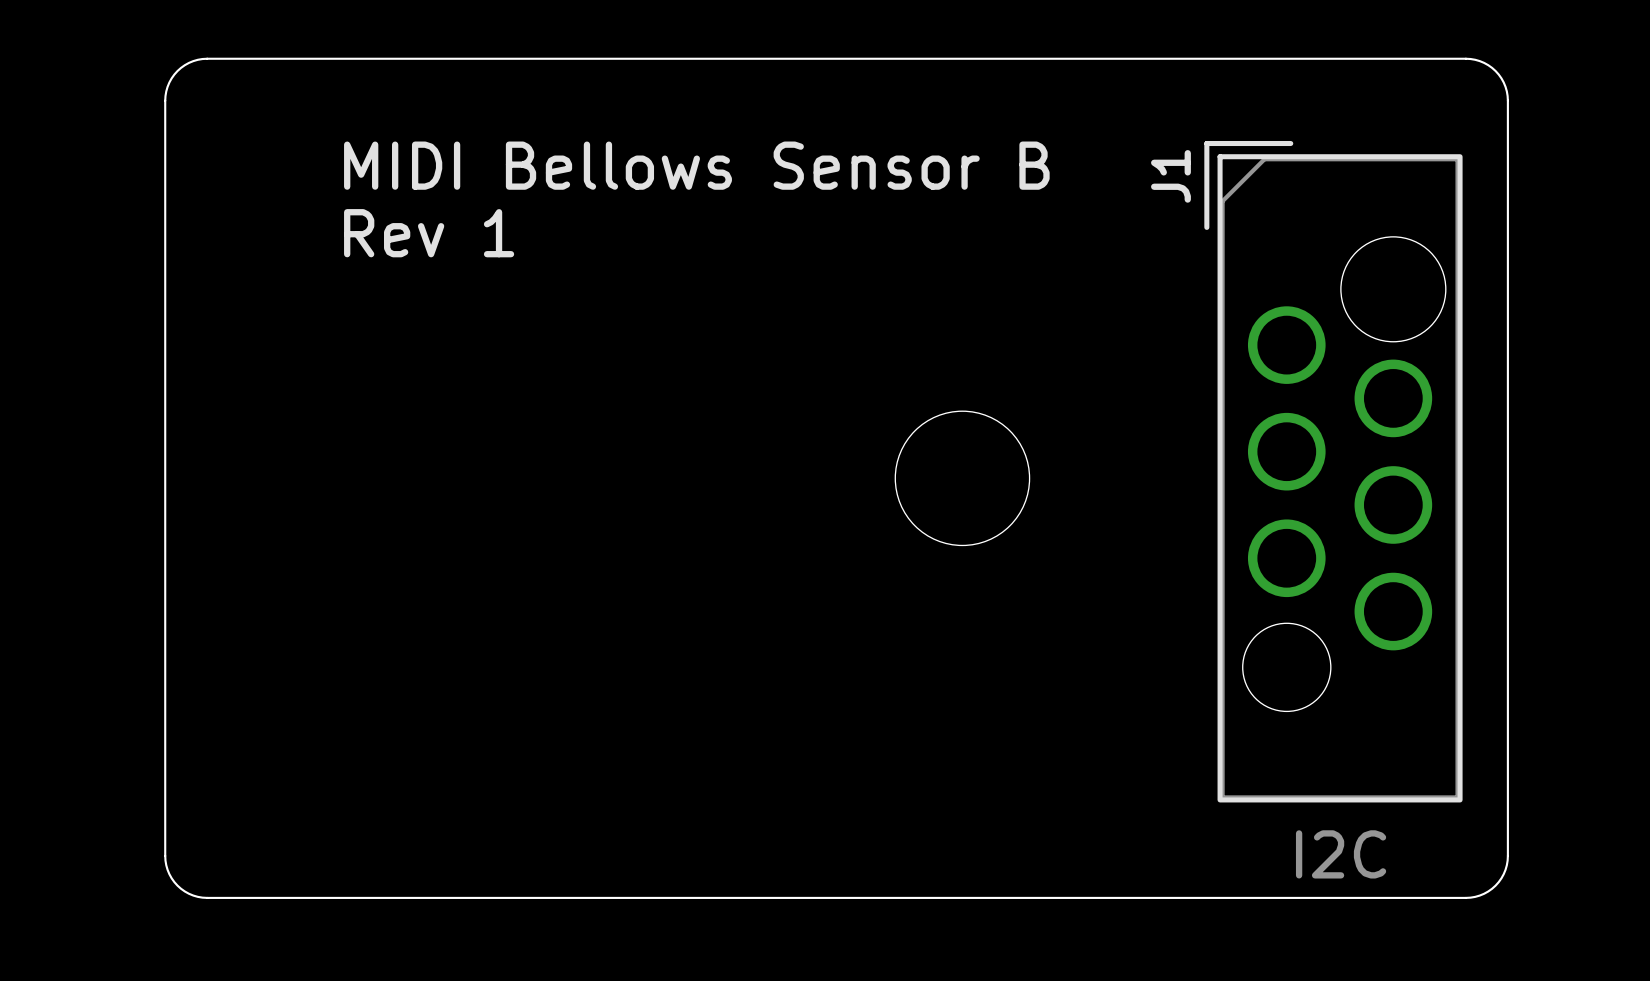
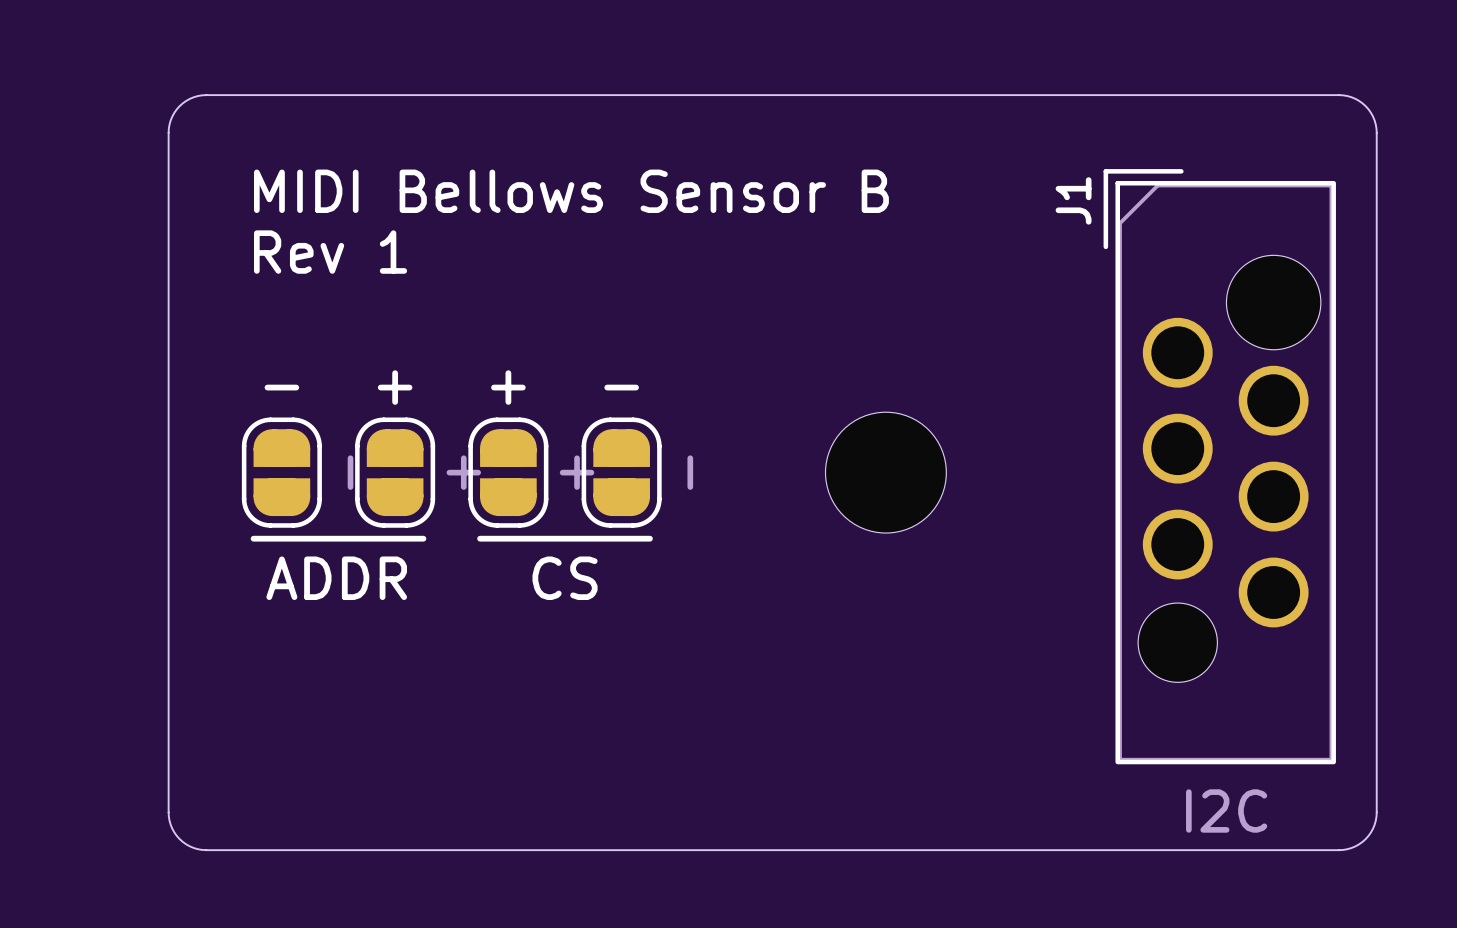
text position: MIDI Bellows Sensor B (696, 165) -> MIDI Bellows Sensor B (571, 191)
text position: Rev 1 (429, 233) -> Rev 1 (330, 252)
text: none -> - (281, 387)
text: none -> + (395, 387)
text: none -> + (508, 387)
text: none -> - (621, 387)
part: none -> - (281, 472)
part: none -> + (395, 472)
part: none -> + (508, 472)
part: none -> - (621, 472)
line: none -> (423, 538) (253, 538)
line: none -> (649, 538) (480, 538)
text: none -> ADDR (336, 578)
text: none -> CS (565, 578)

